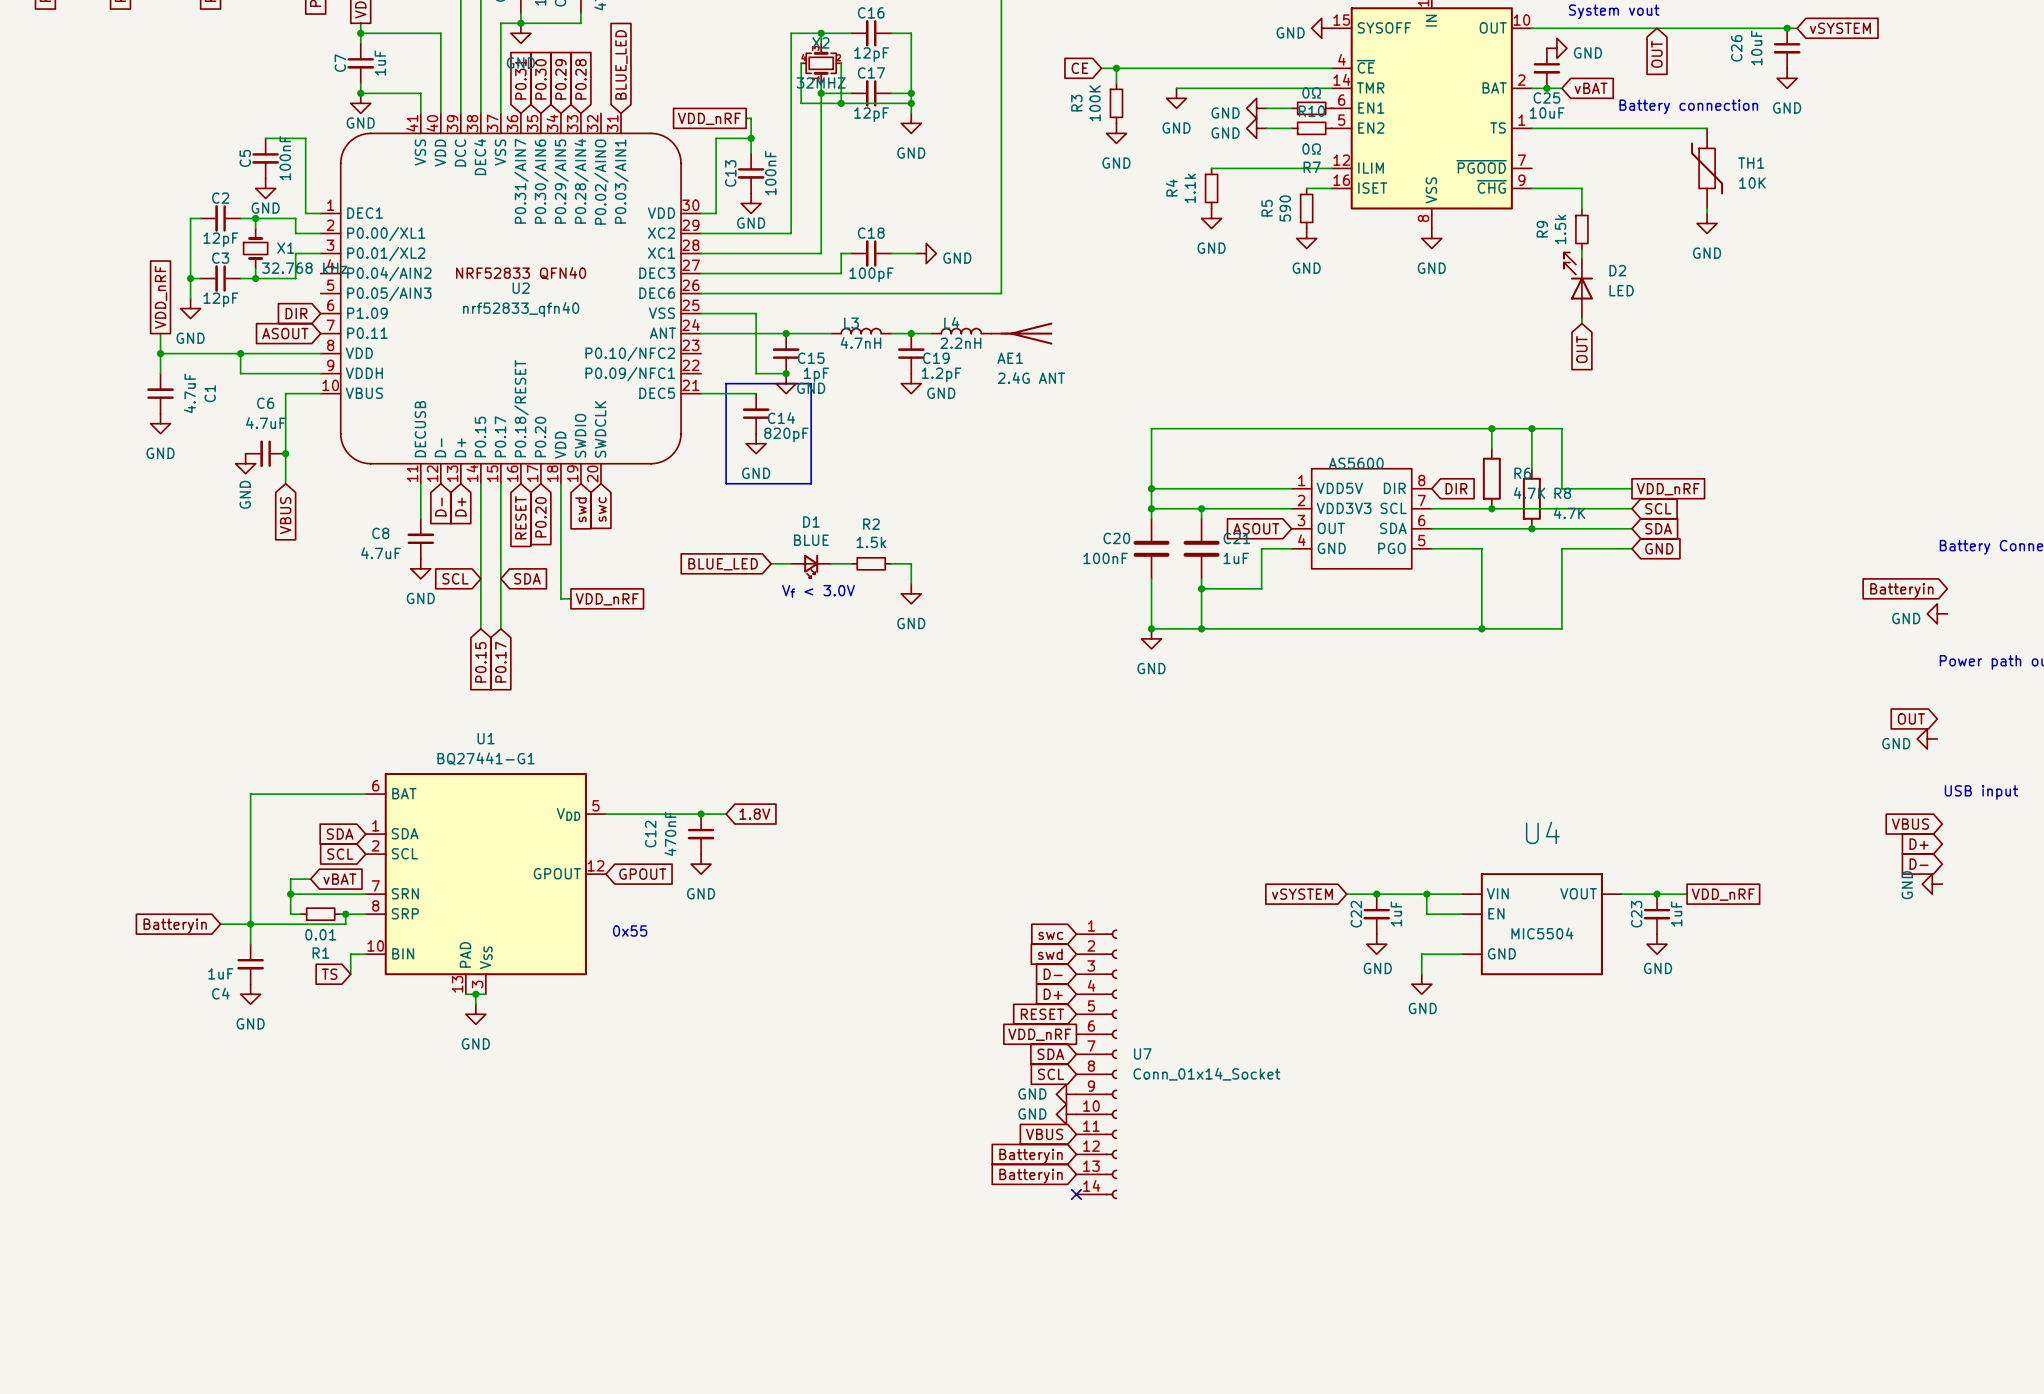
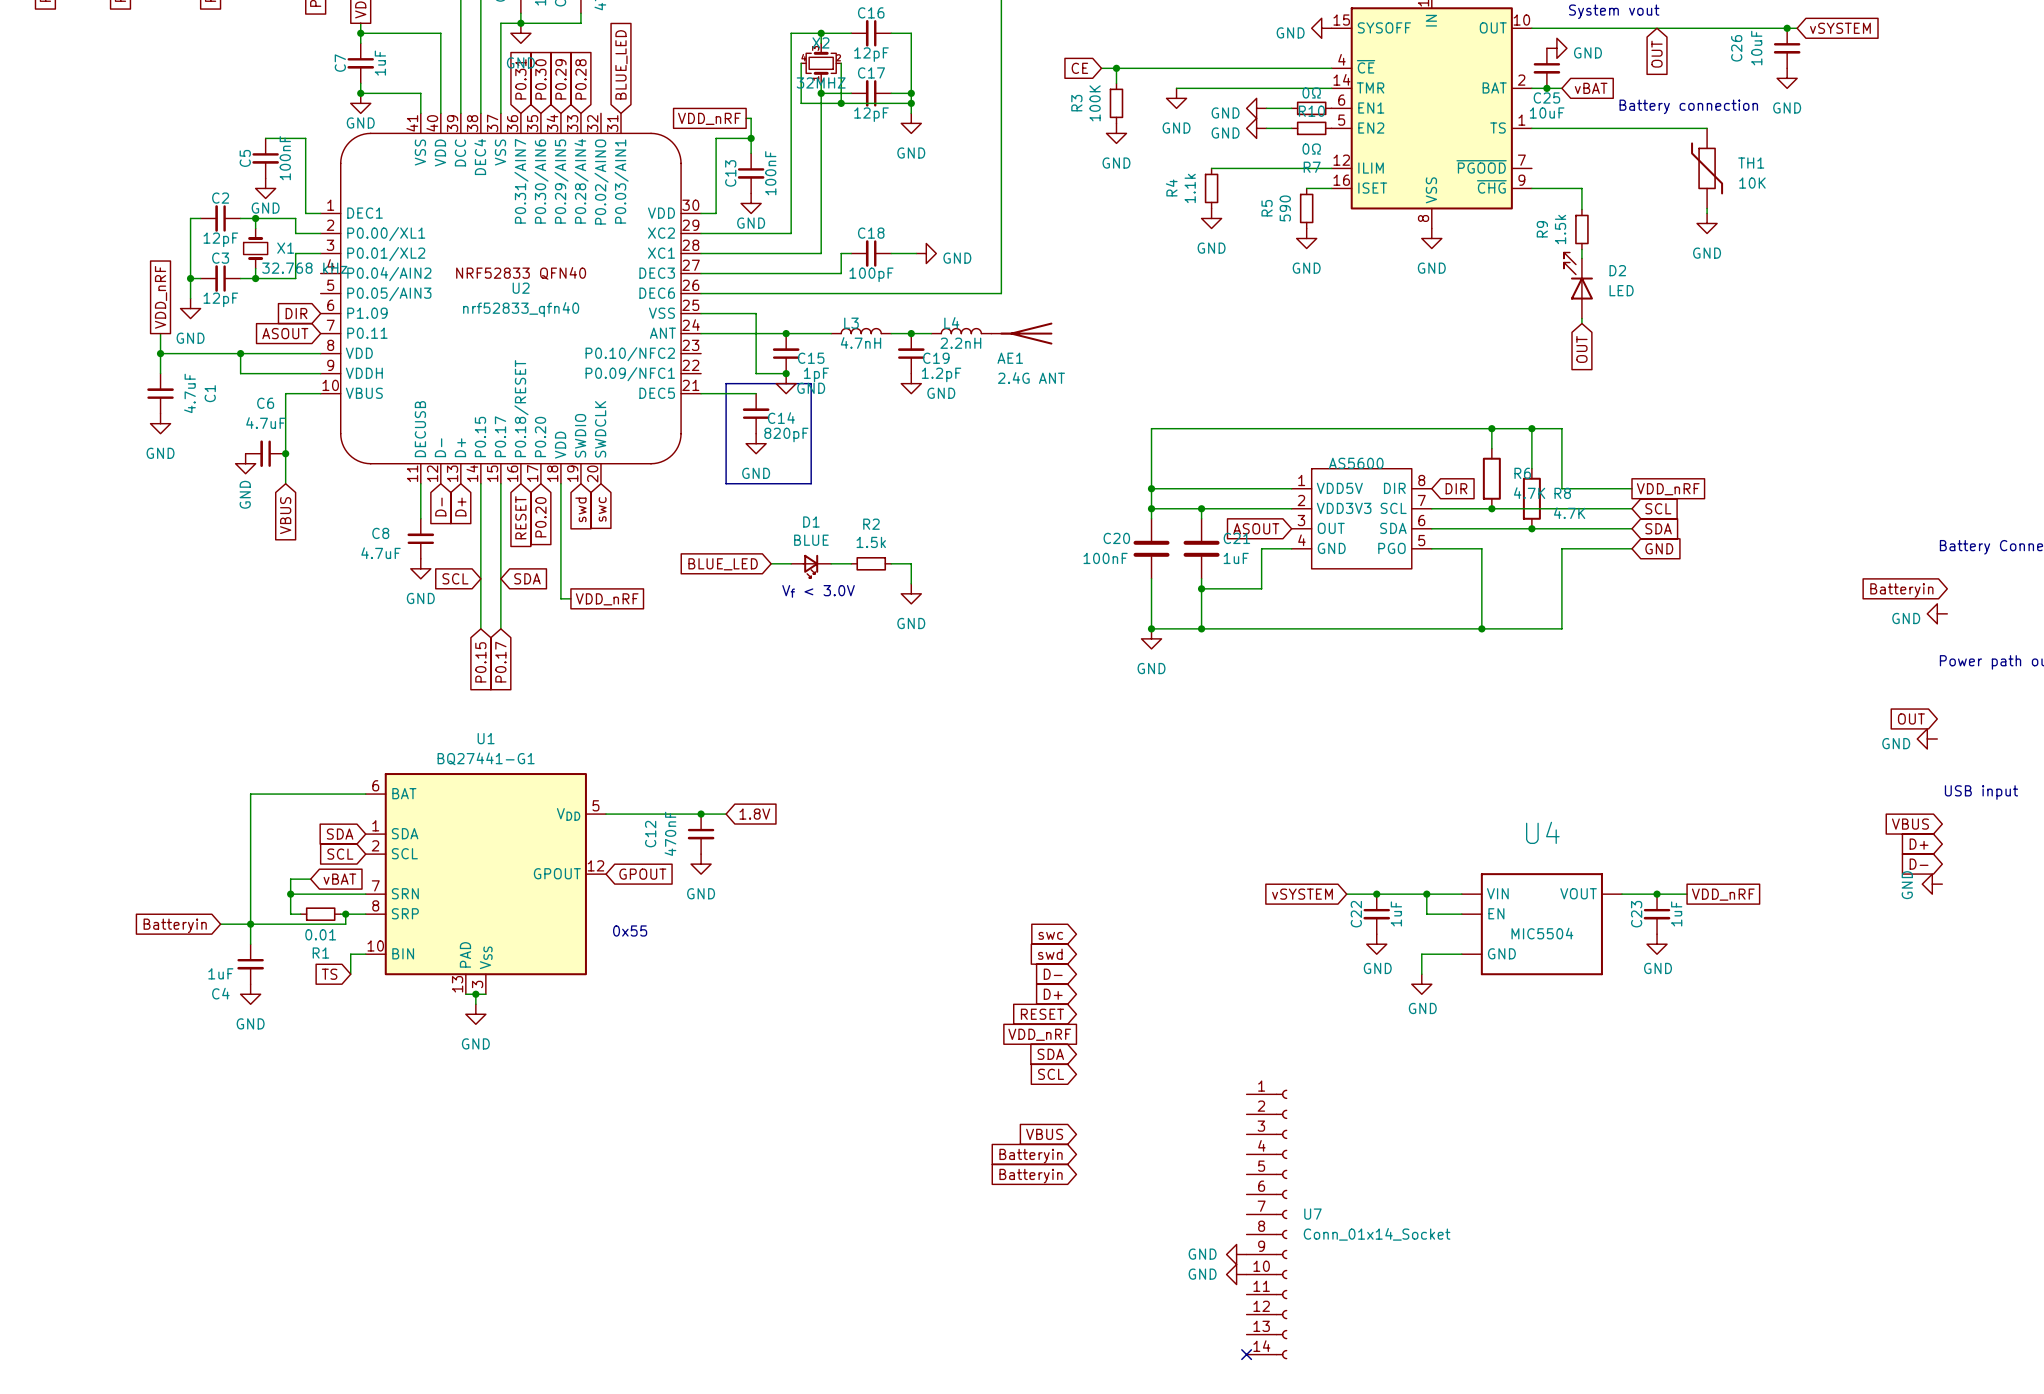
U7 position: (1096, 1064) -> (1266, 1224)
power symbol: GND (1066, 1094) -> none
power symbol: GND (1066, 1114) -> none
no-connect mark: (1076, 1194) -> none
power symbol: none -> GND (1236, 1254)
power symbol: none -> GND (1236, 1274)
no-connect mark: none -> (1246, 1354)

